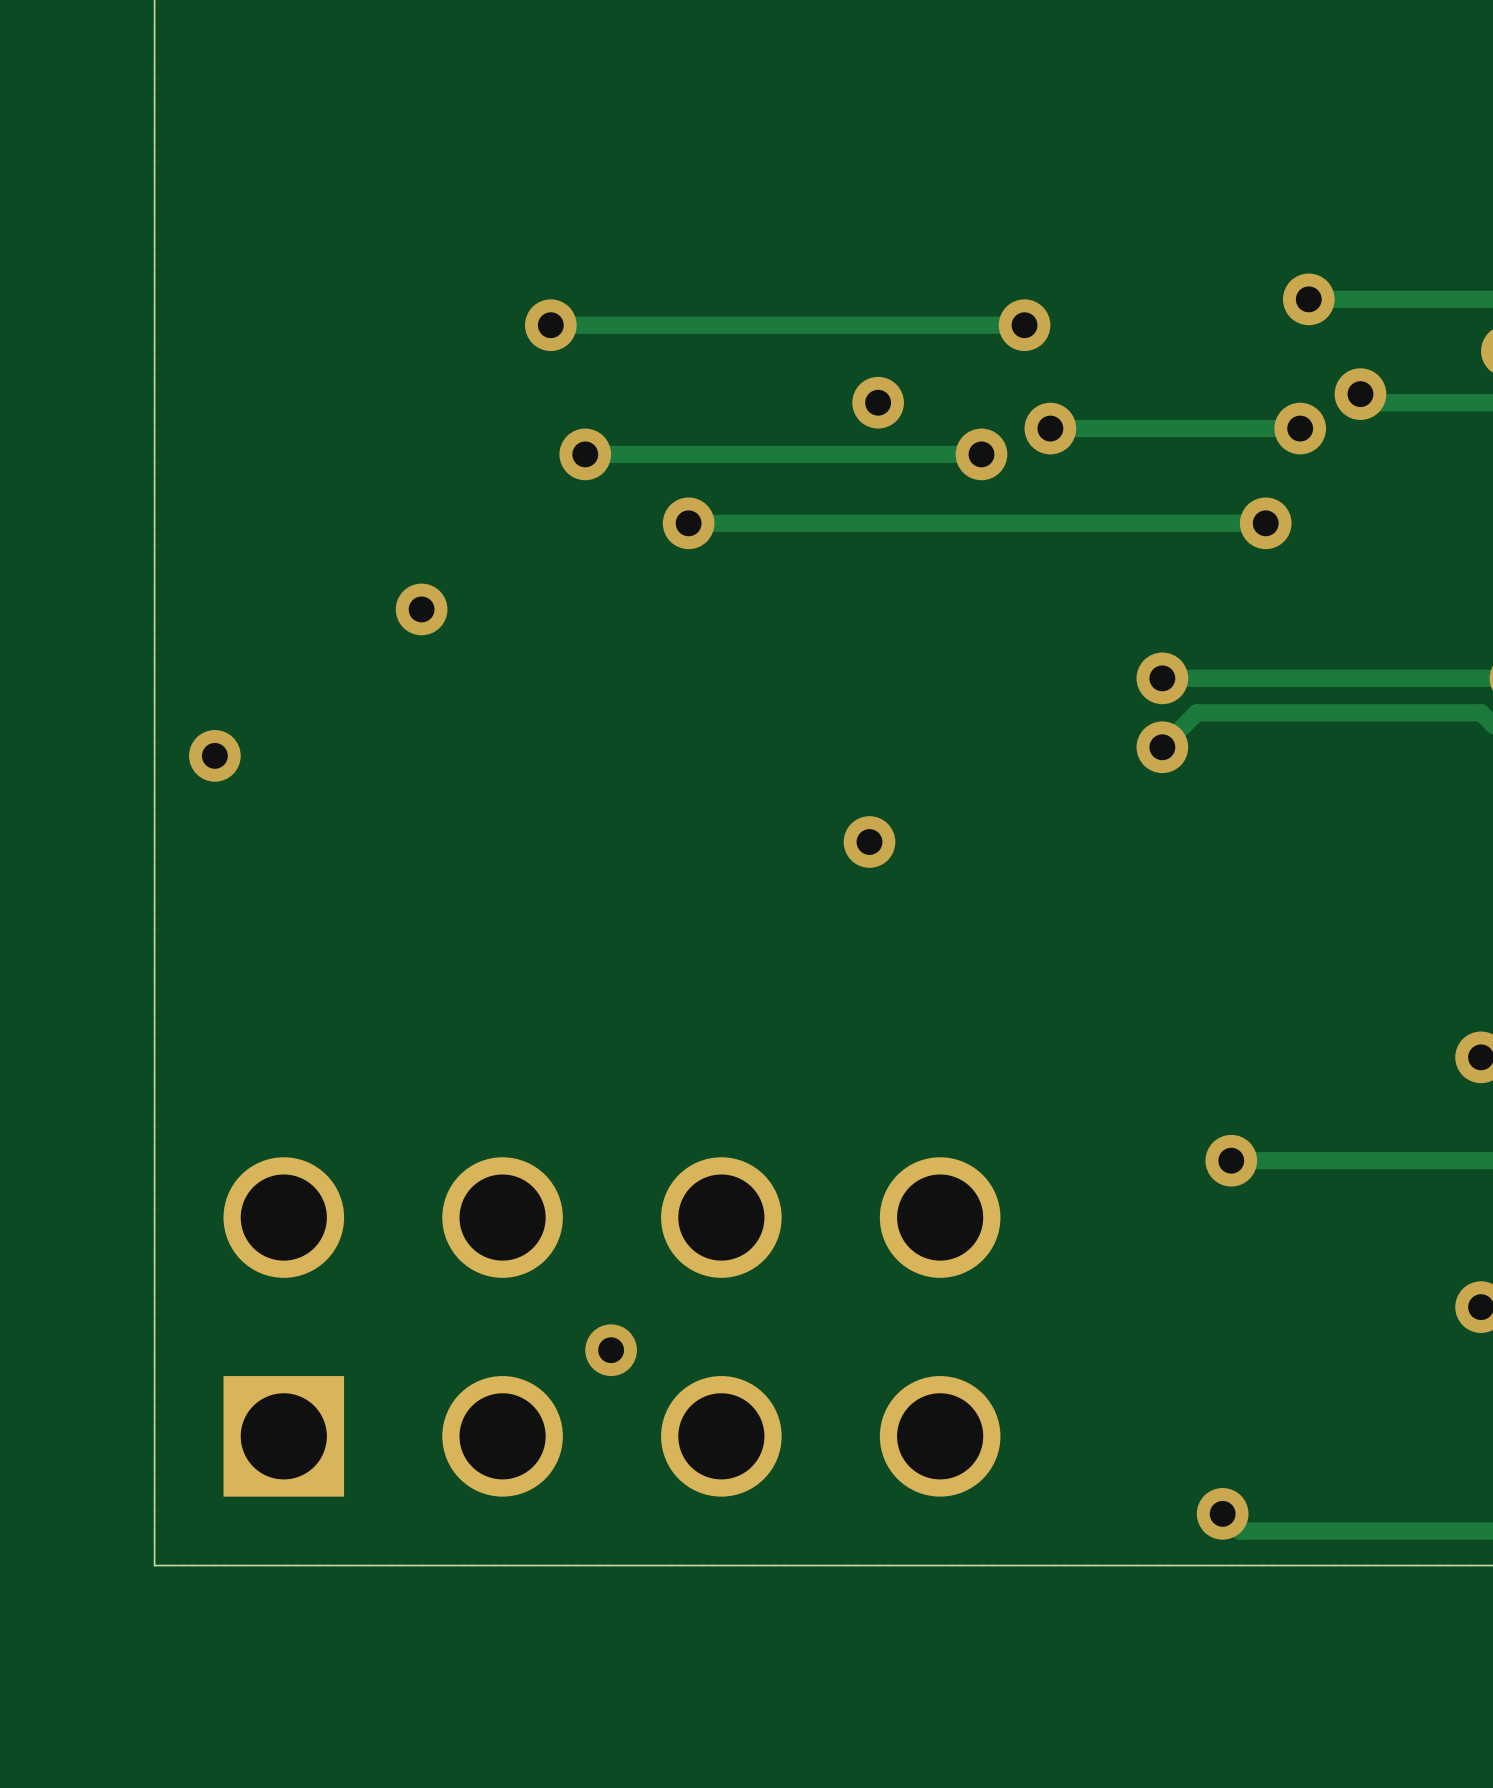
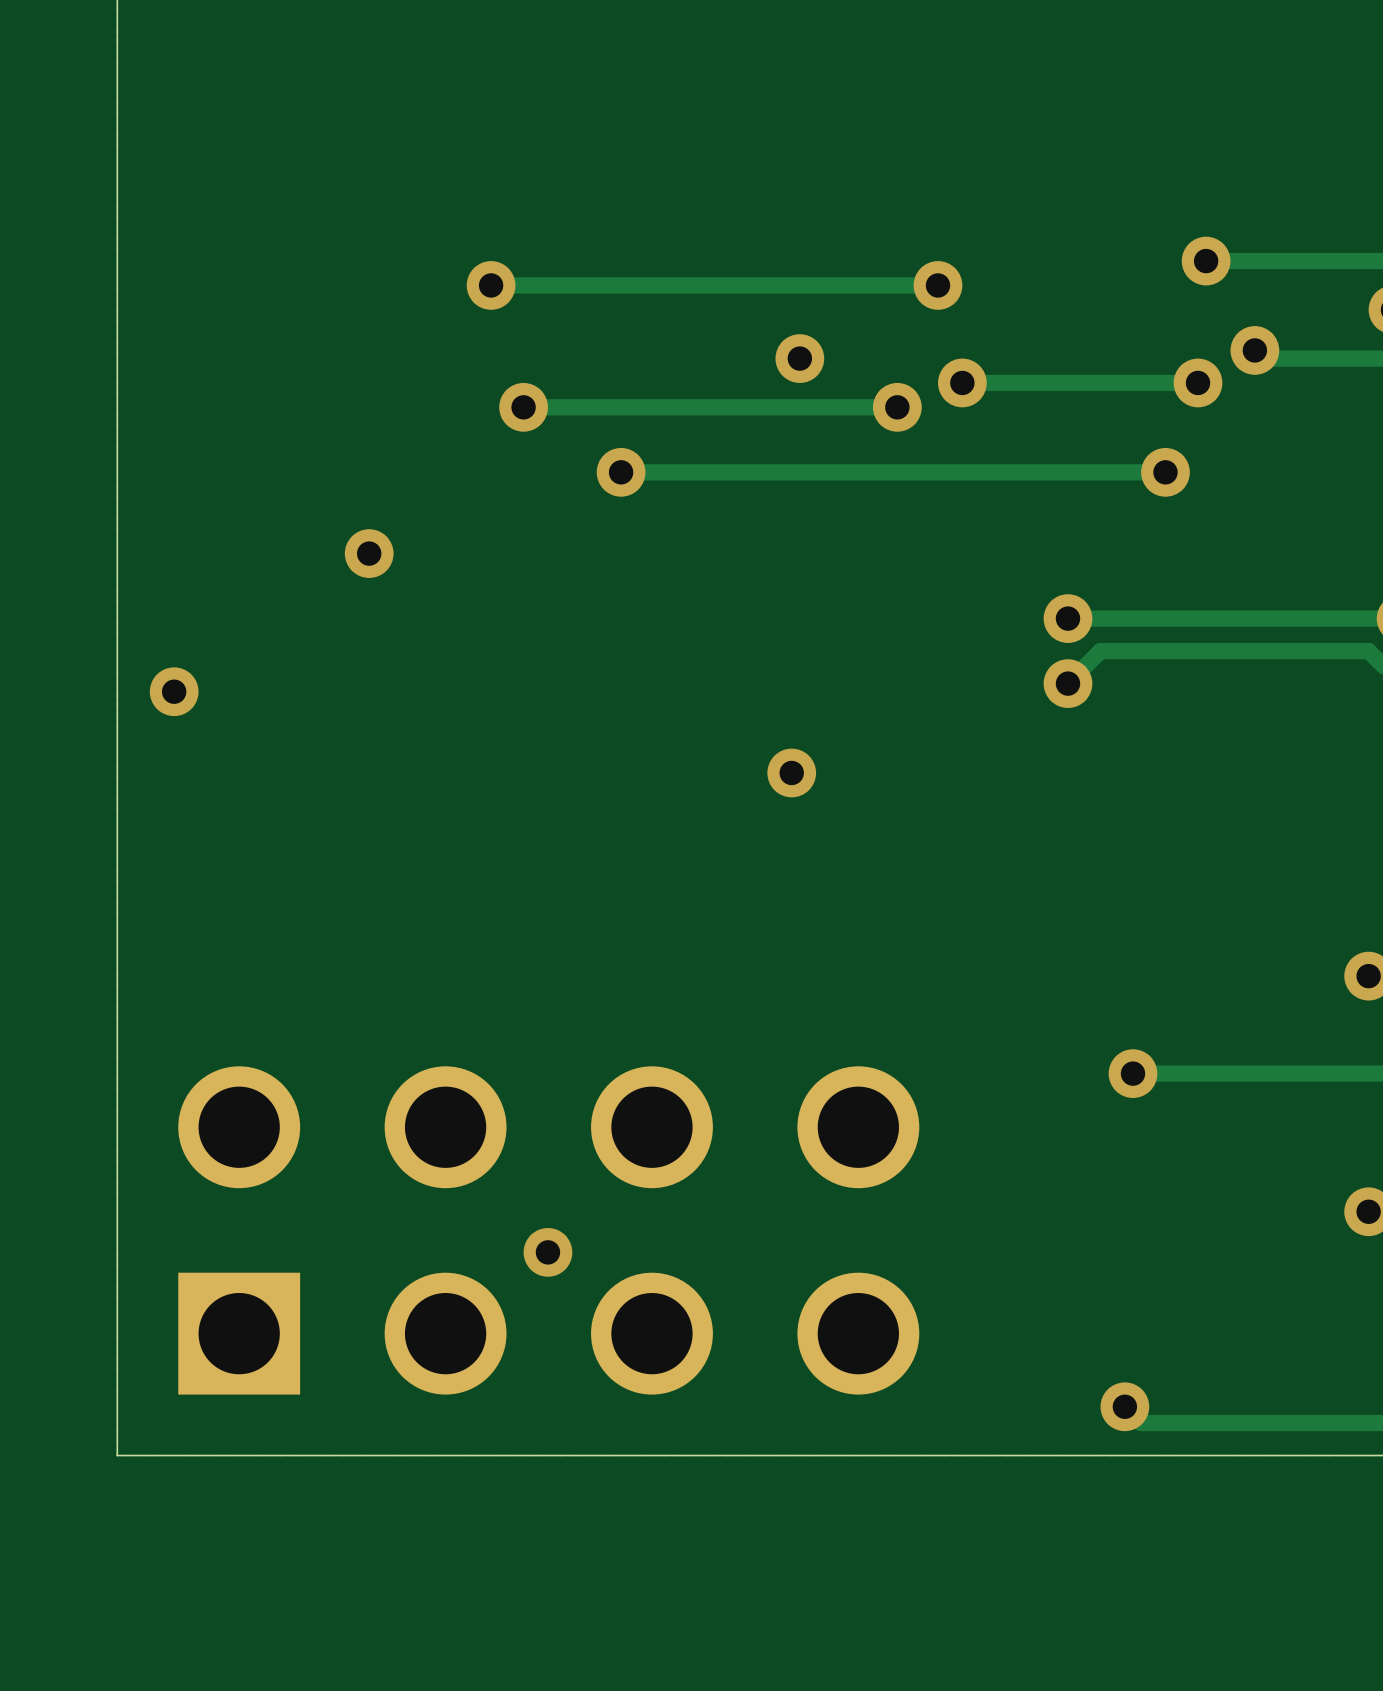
part footprint: [223, 1157, 1001, 1497] -> [178, 1066, 920, 1395]

